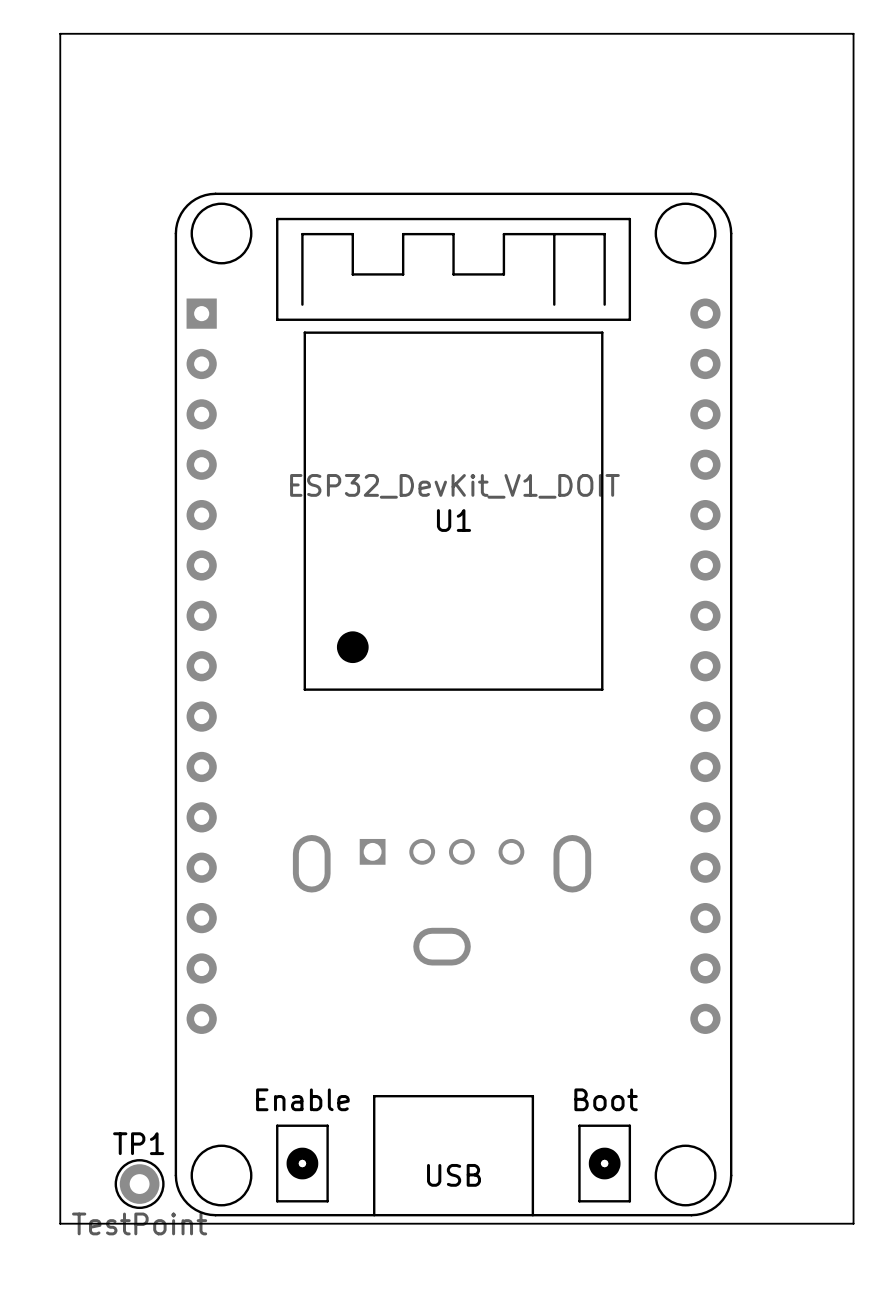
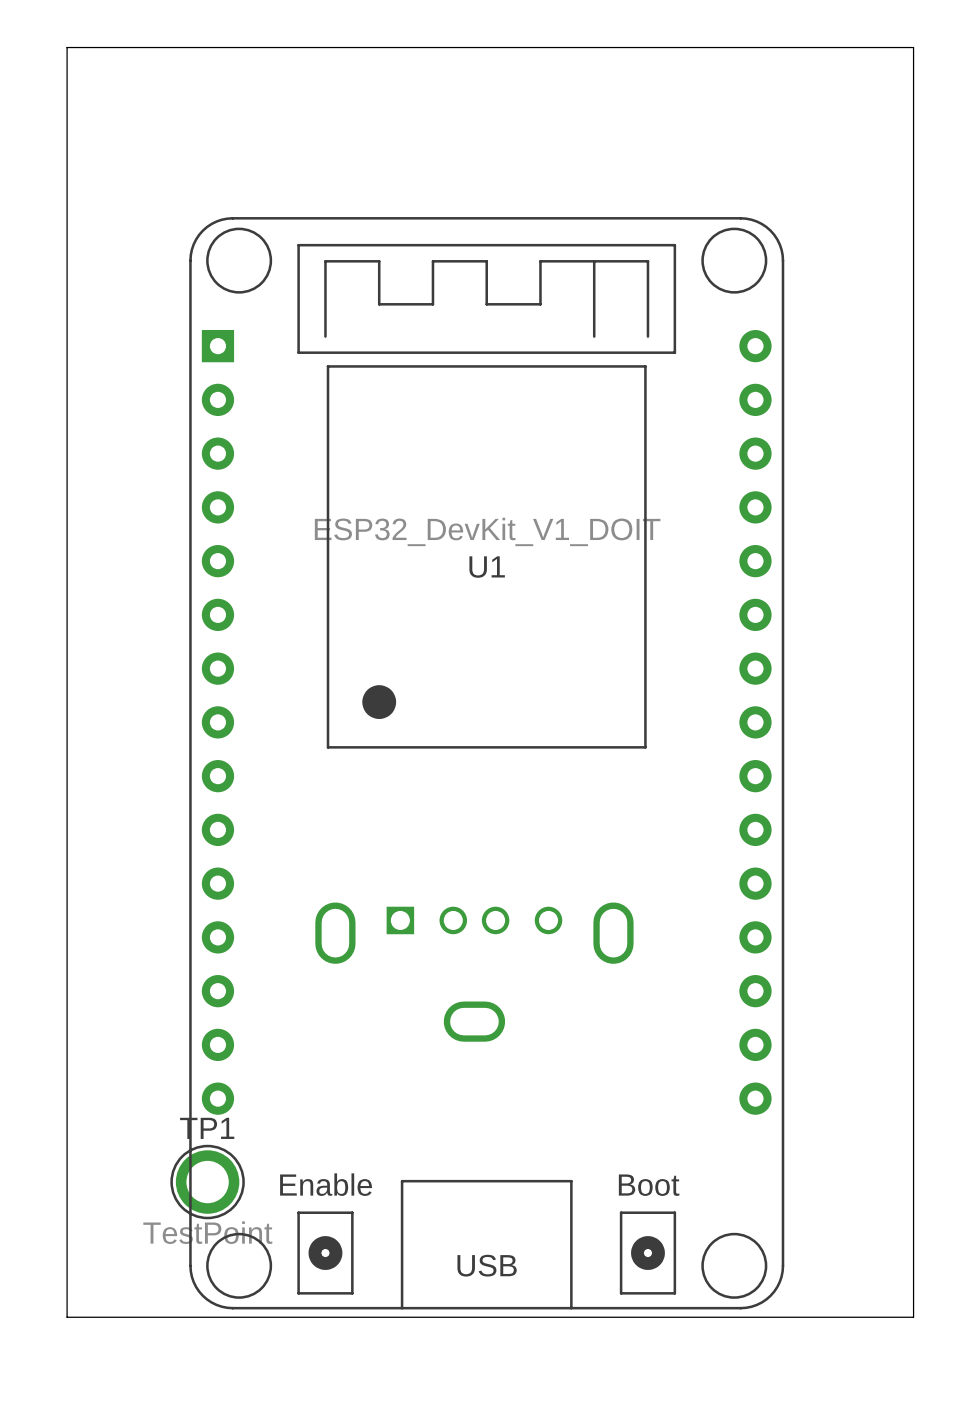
TP1 footprint: [114, 1159, 165, 1210] -> [170, 1144, 245, 1220]

